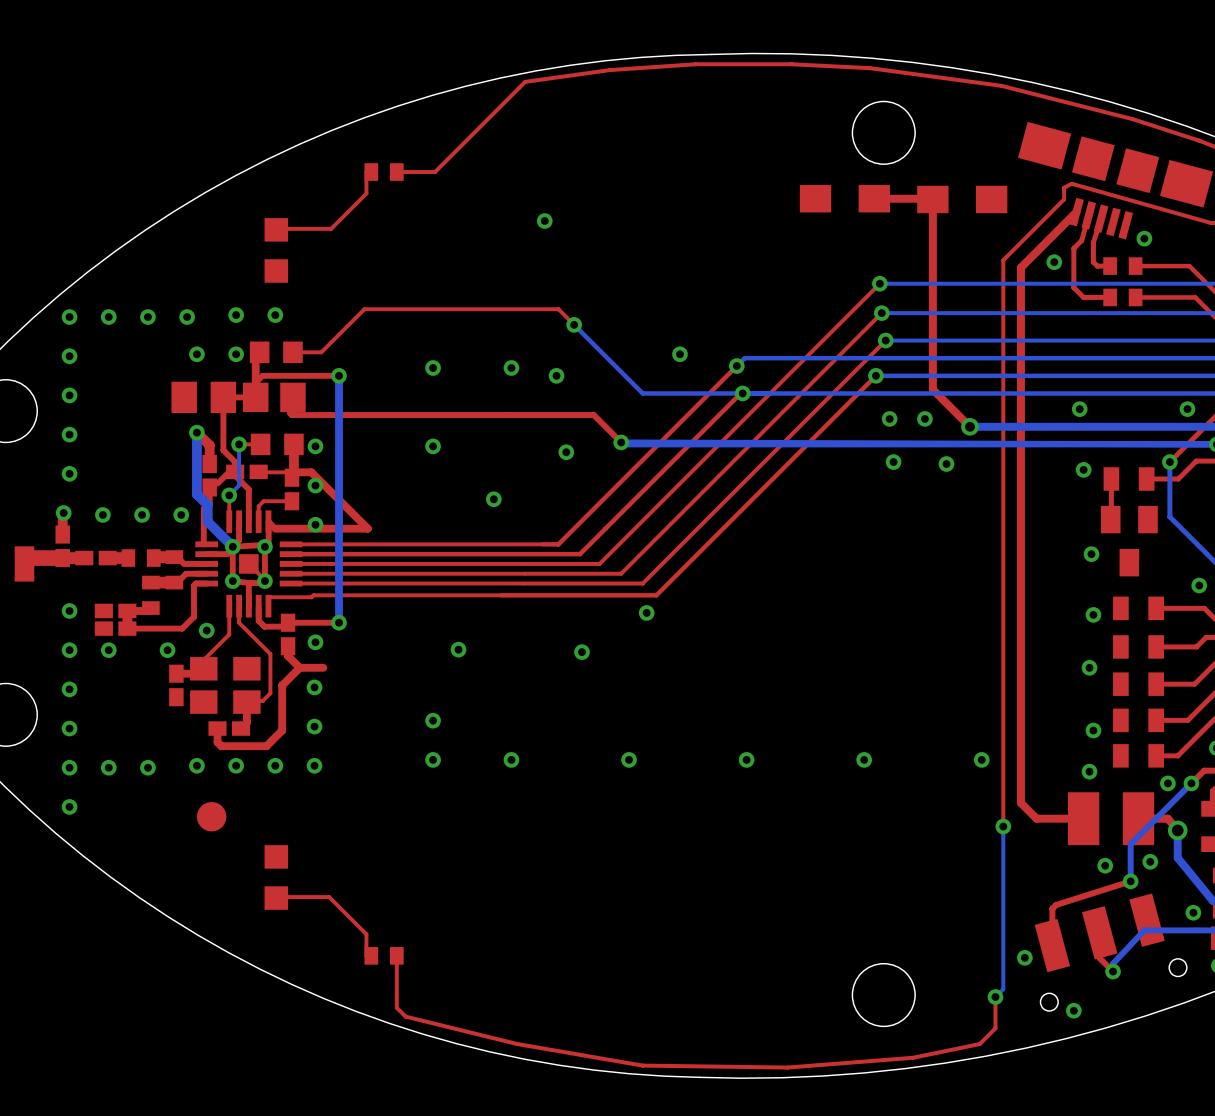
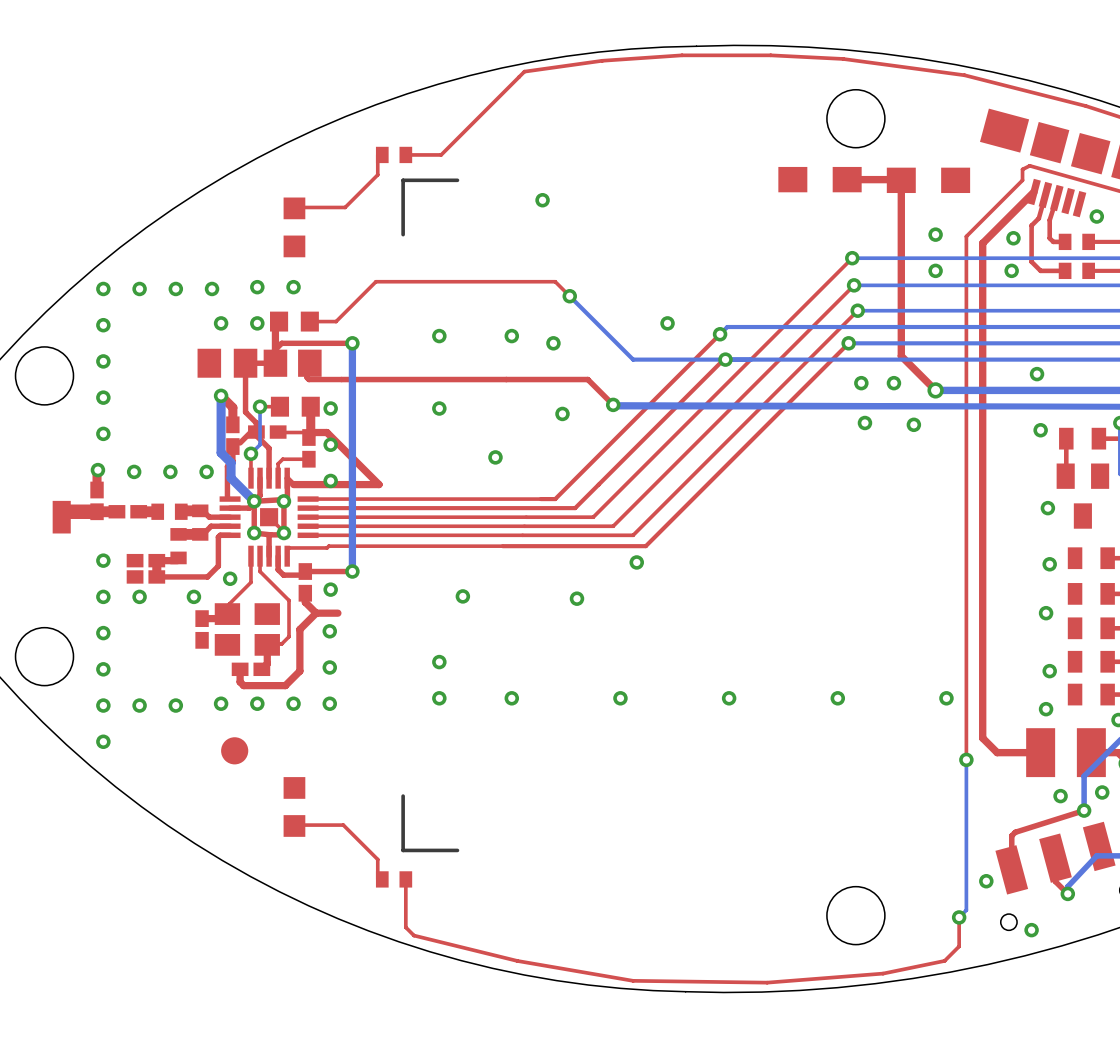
line: none -> (457, 180) (403, 180) (403, 234)
via: none -> (935, 234)
via: none -> (935, 270)
via: none -> (1011, 270)
line: none -> (403, 796) (403, 850) (457, 850)

